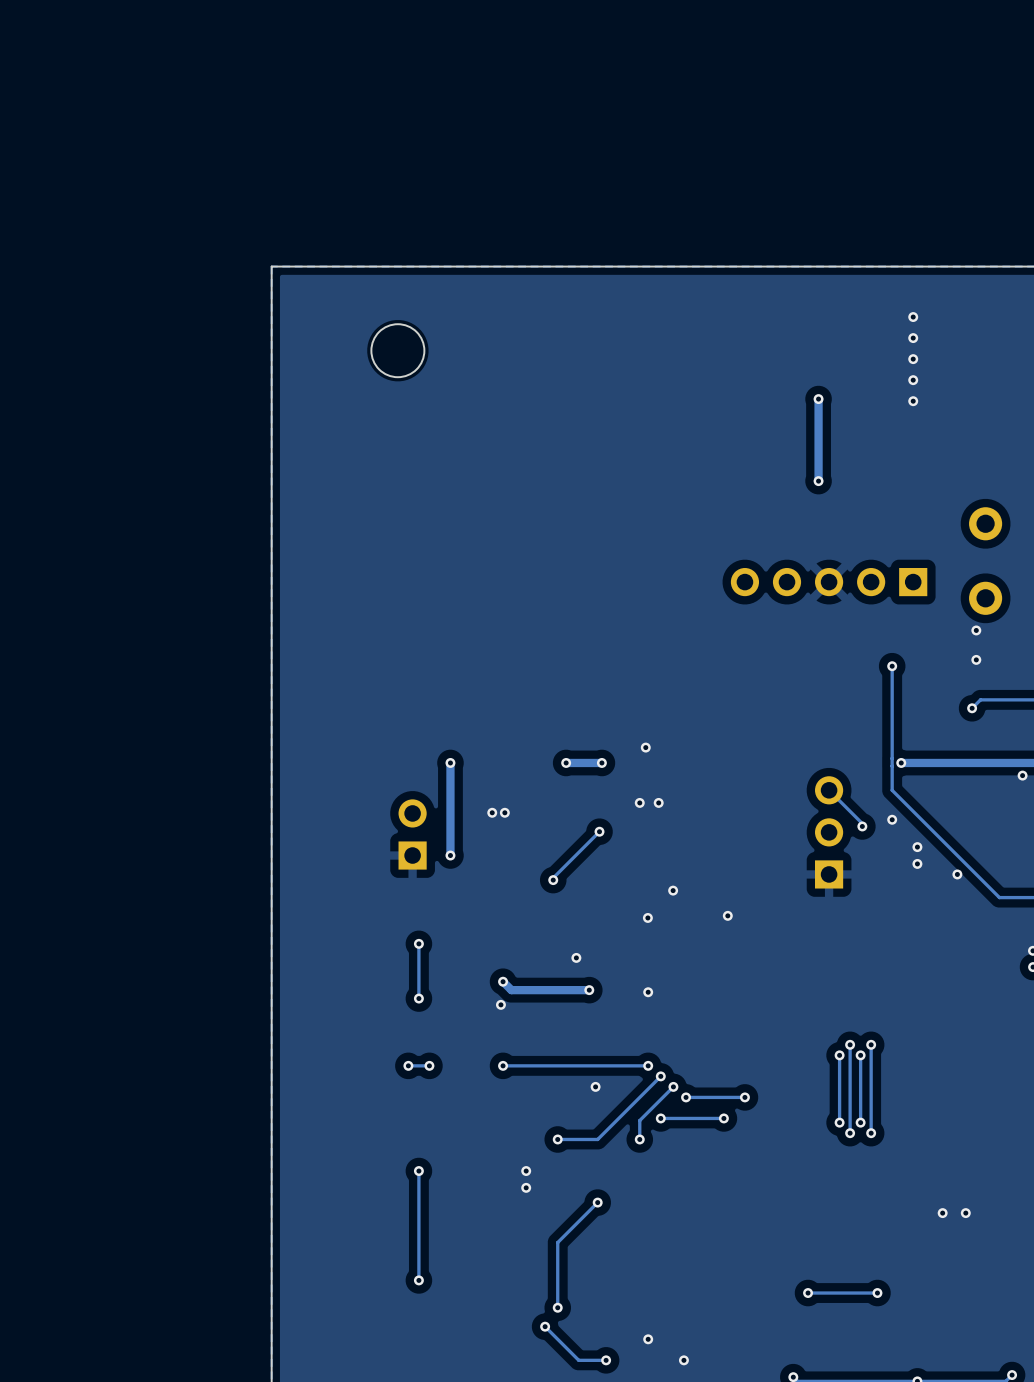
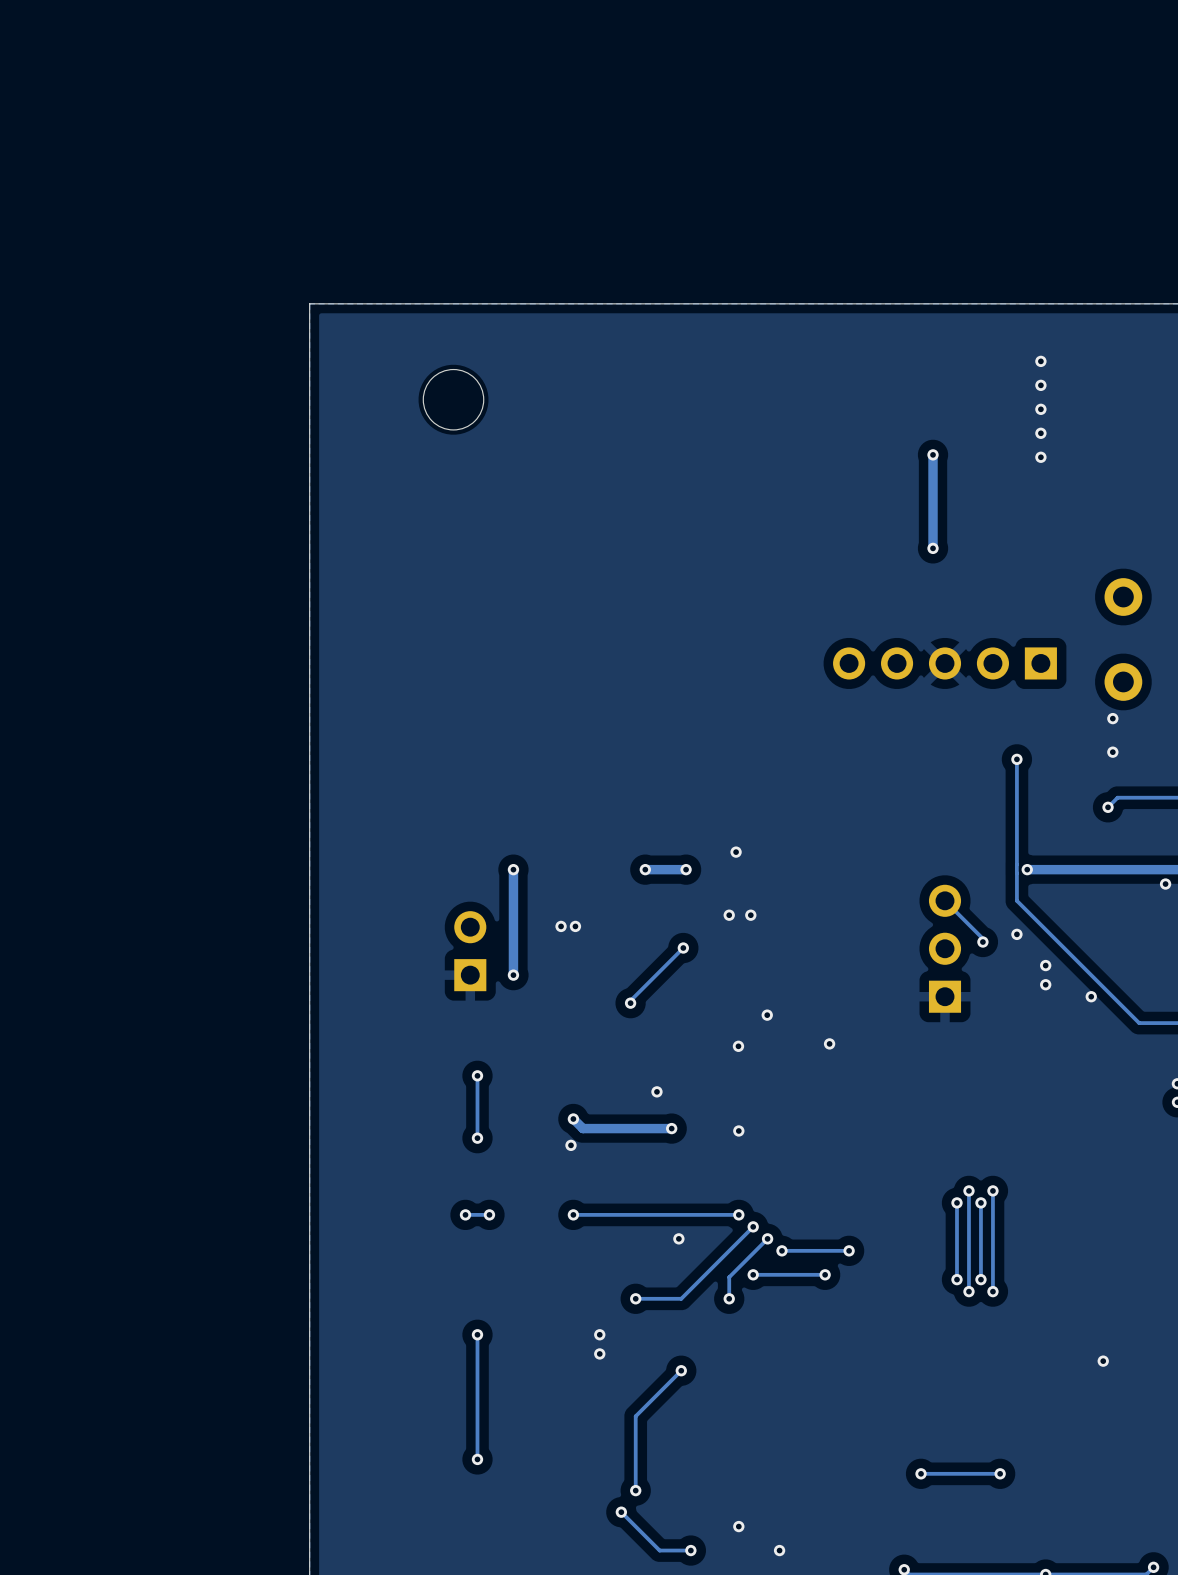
via: none -> (1103, 1361)
via: (942, 1213) -> none
via: (965, 1213) -> none

